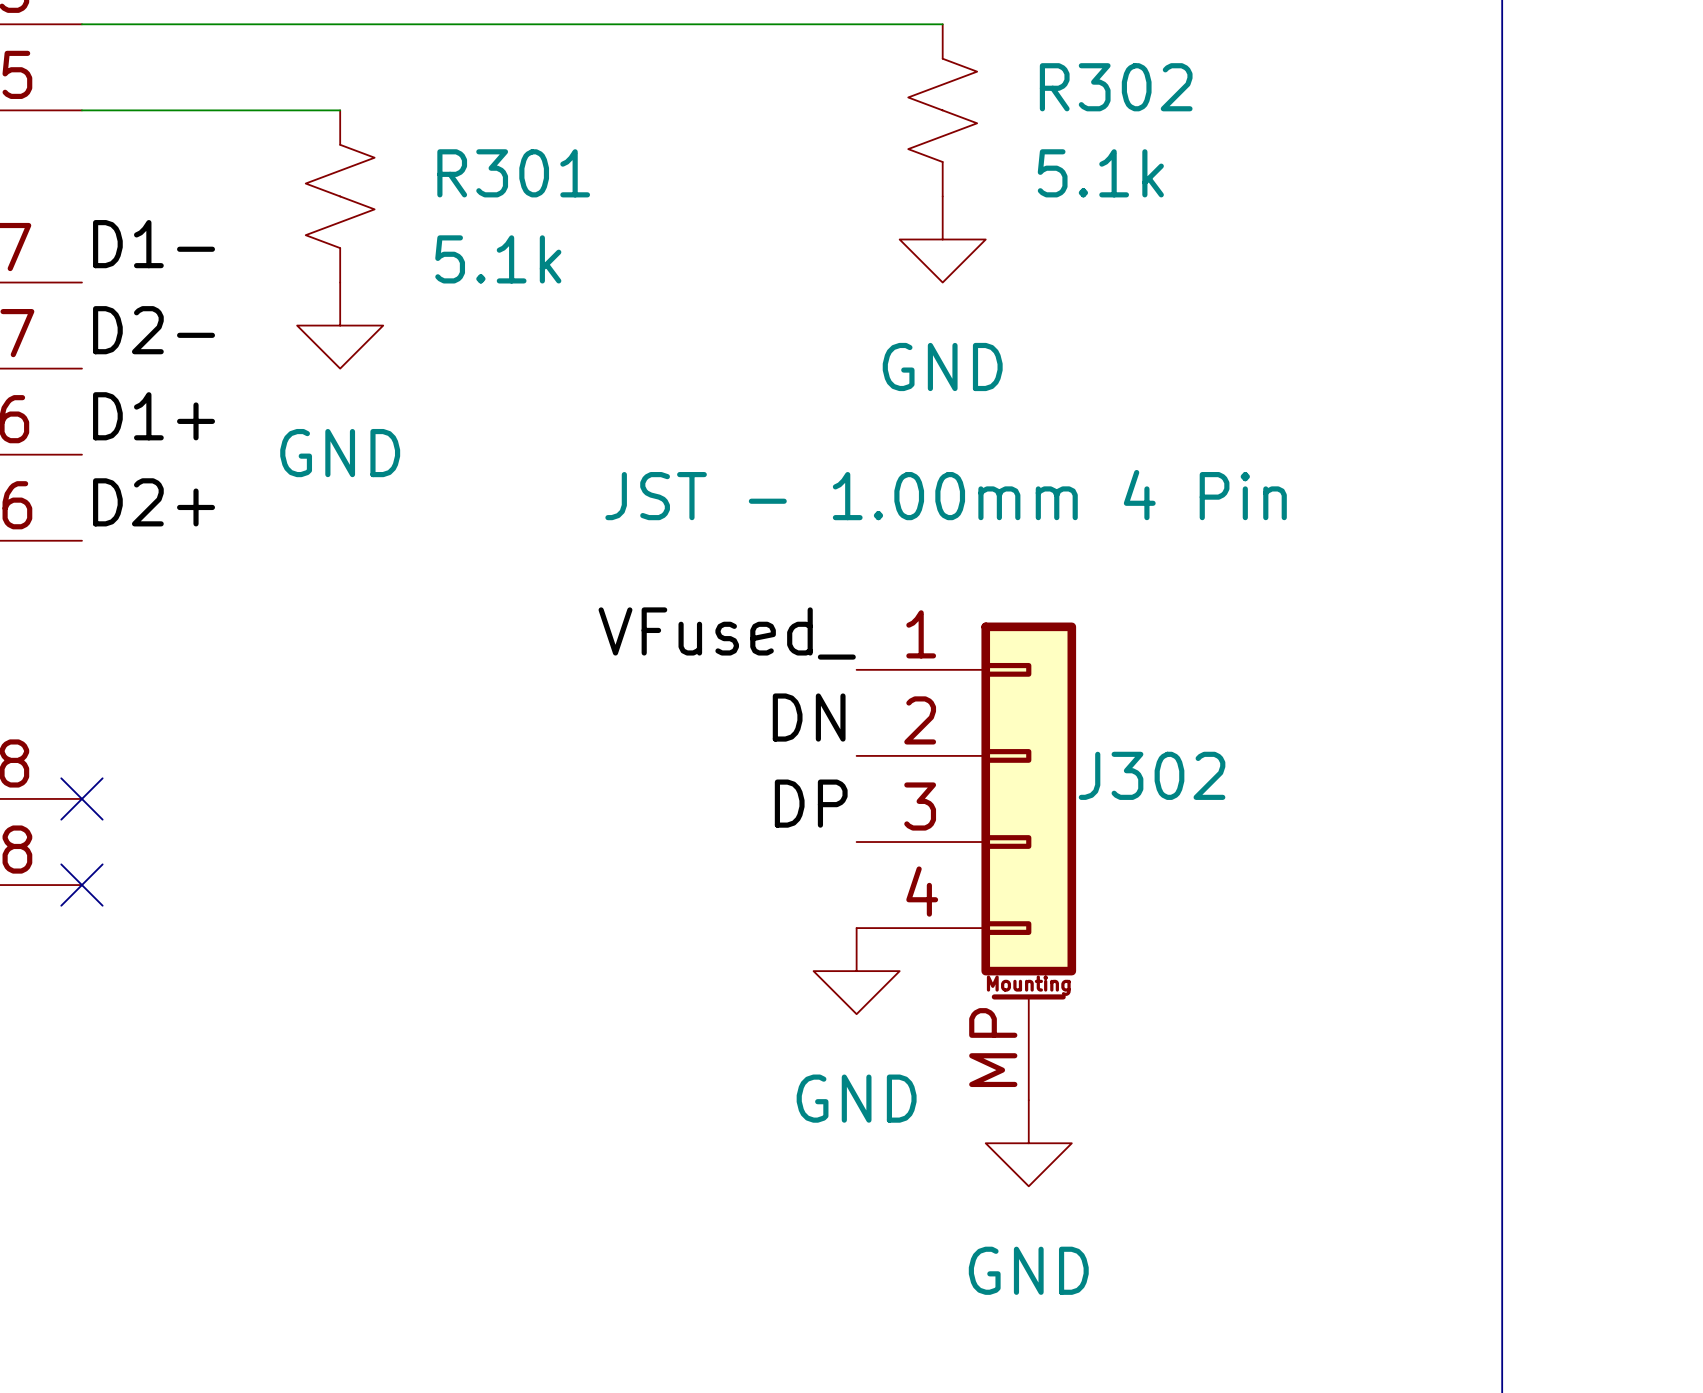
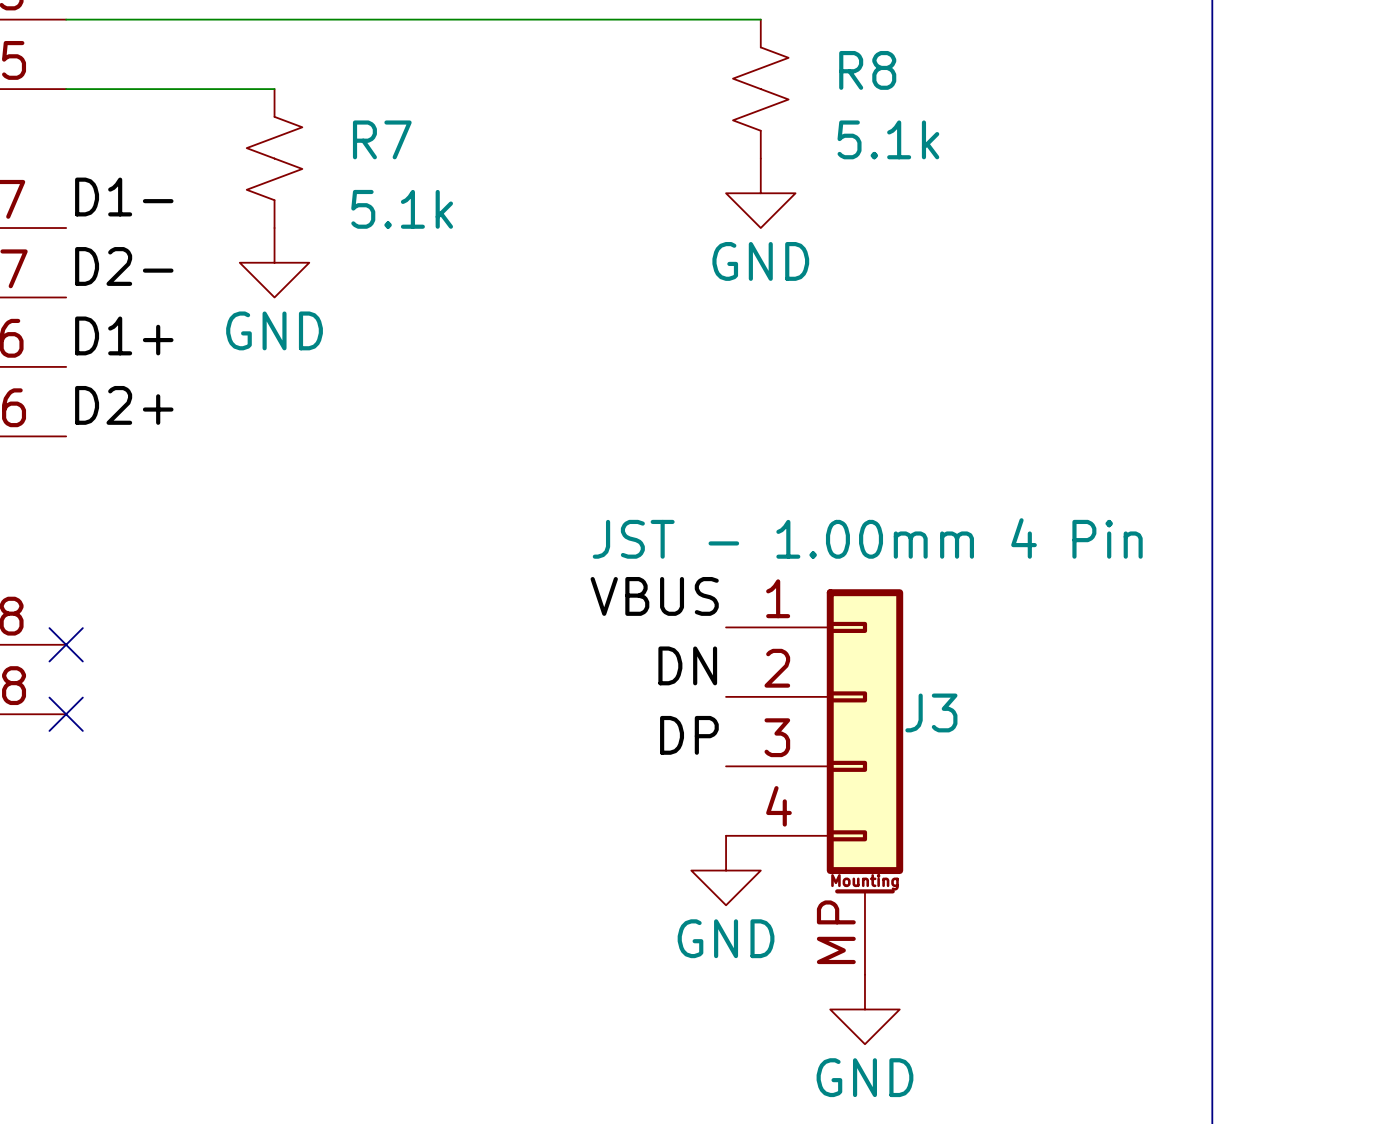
R302 name: R302 (1116, 87) -> R8 (867, 70)
R301 name: R301 (513, 173) -> R7 (382, 139)
power symbol text position: GND (942, 366) -> GND (760, 261)
power symbol text position: GND (340, 453) -> GND (274, 330)
label: VFused_ (727, 633) -> none
label position: DN (809, 717) -> DN (687, 665)
label: none -> VBUS (654, 596)
label position: DP (811, 803) -> DP (689, 735)
J302: JST - 1.00mm 4 Pin (966, 861) -> none
J3: none -> JST - 1.00mm 4 Pin (814, 781)
power symbol: GND (856, 971) -> none
power symbol: none -> GND (726, 870)
power symbol: GND (1028, 1143) -> none
power symbol: none -> GND (864, 1009)

